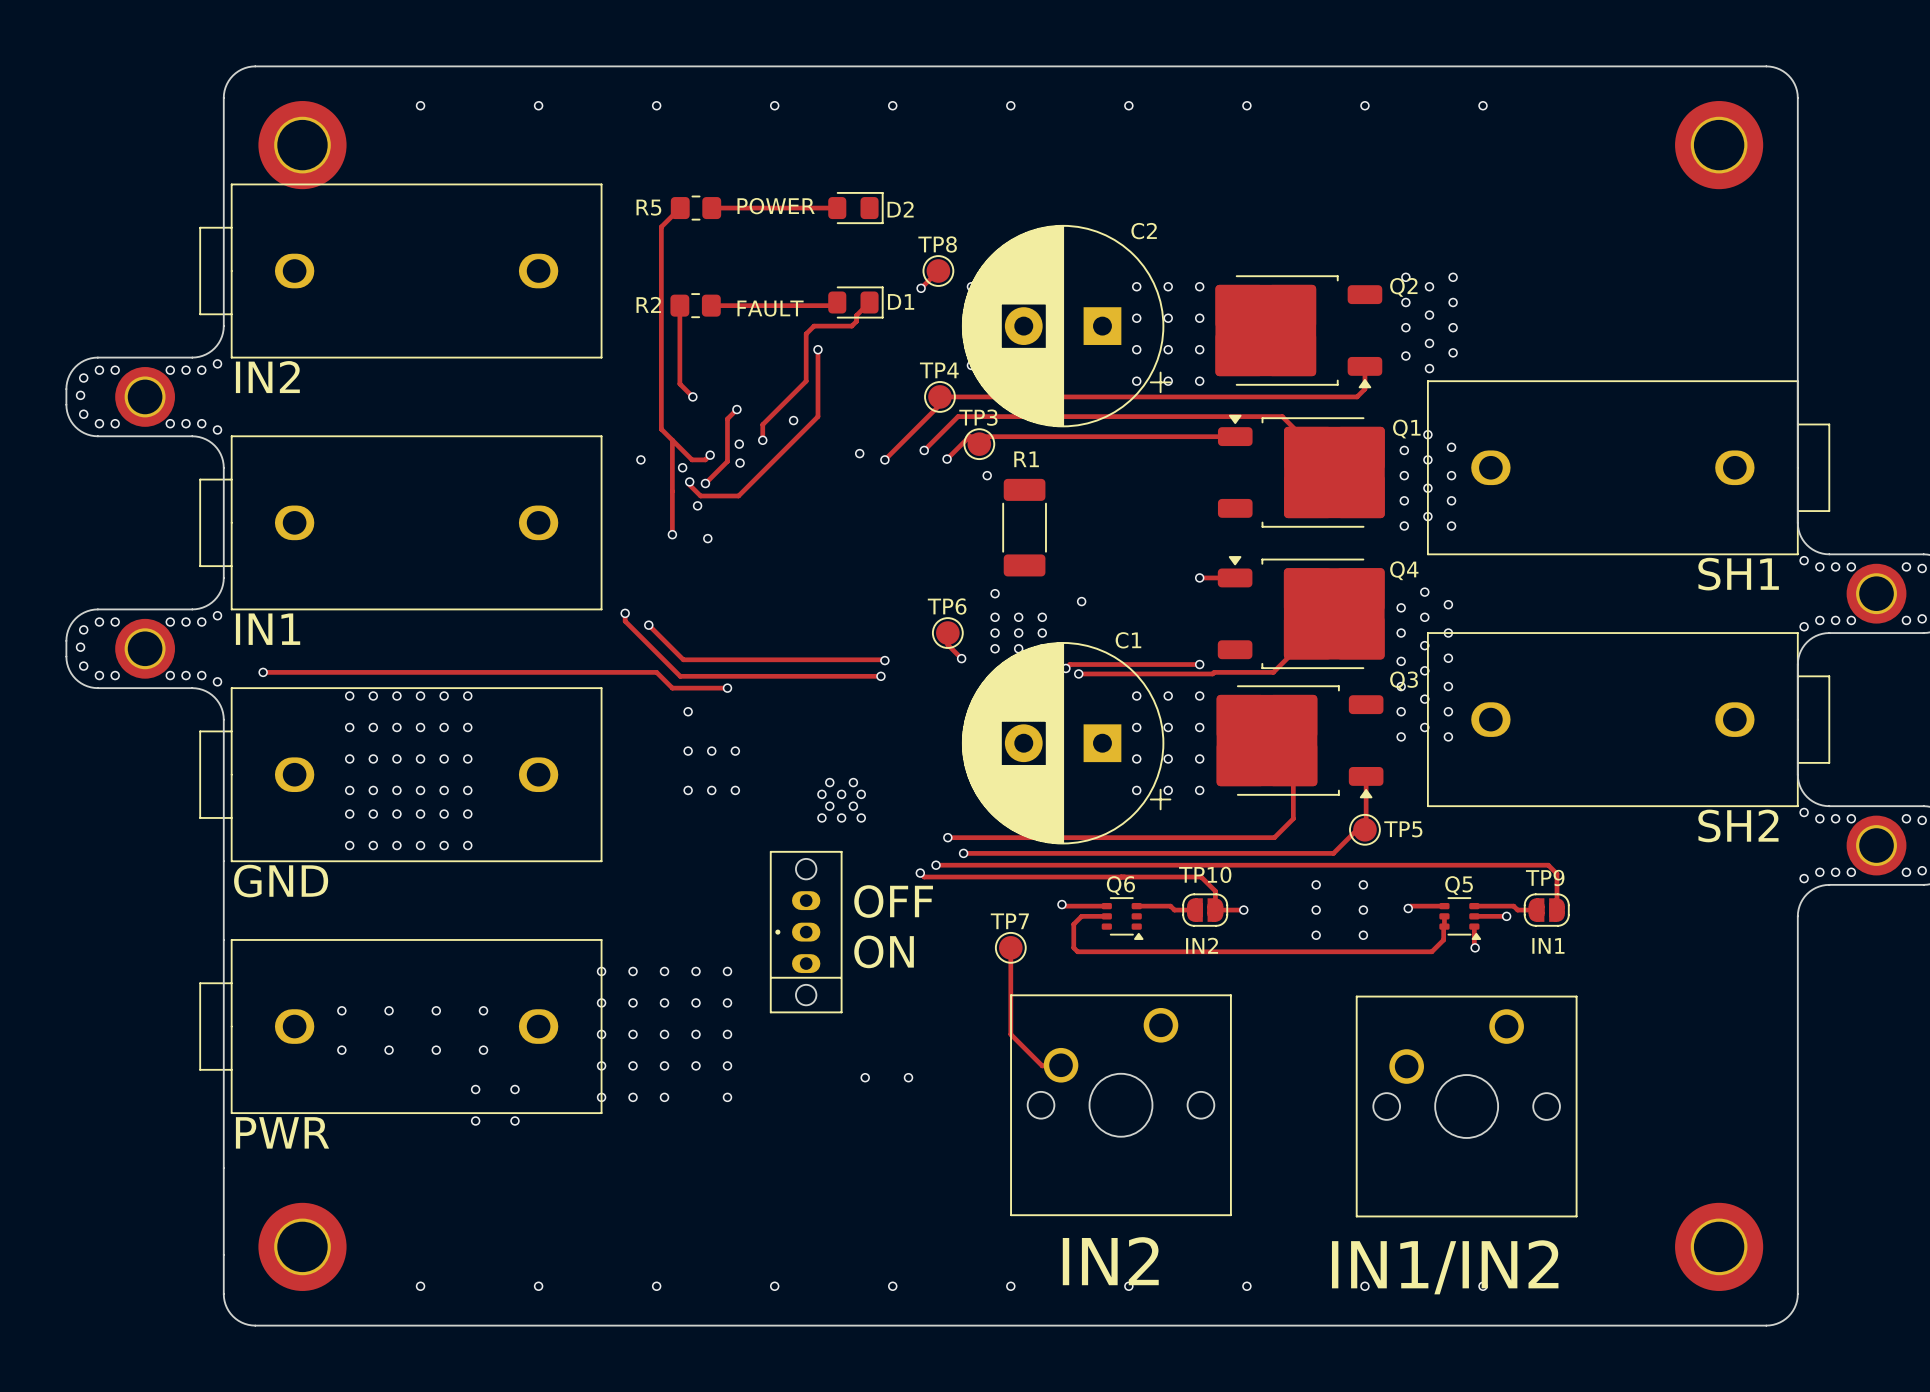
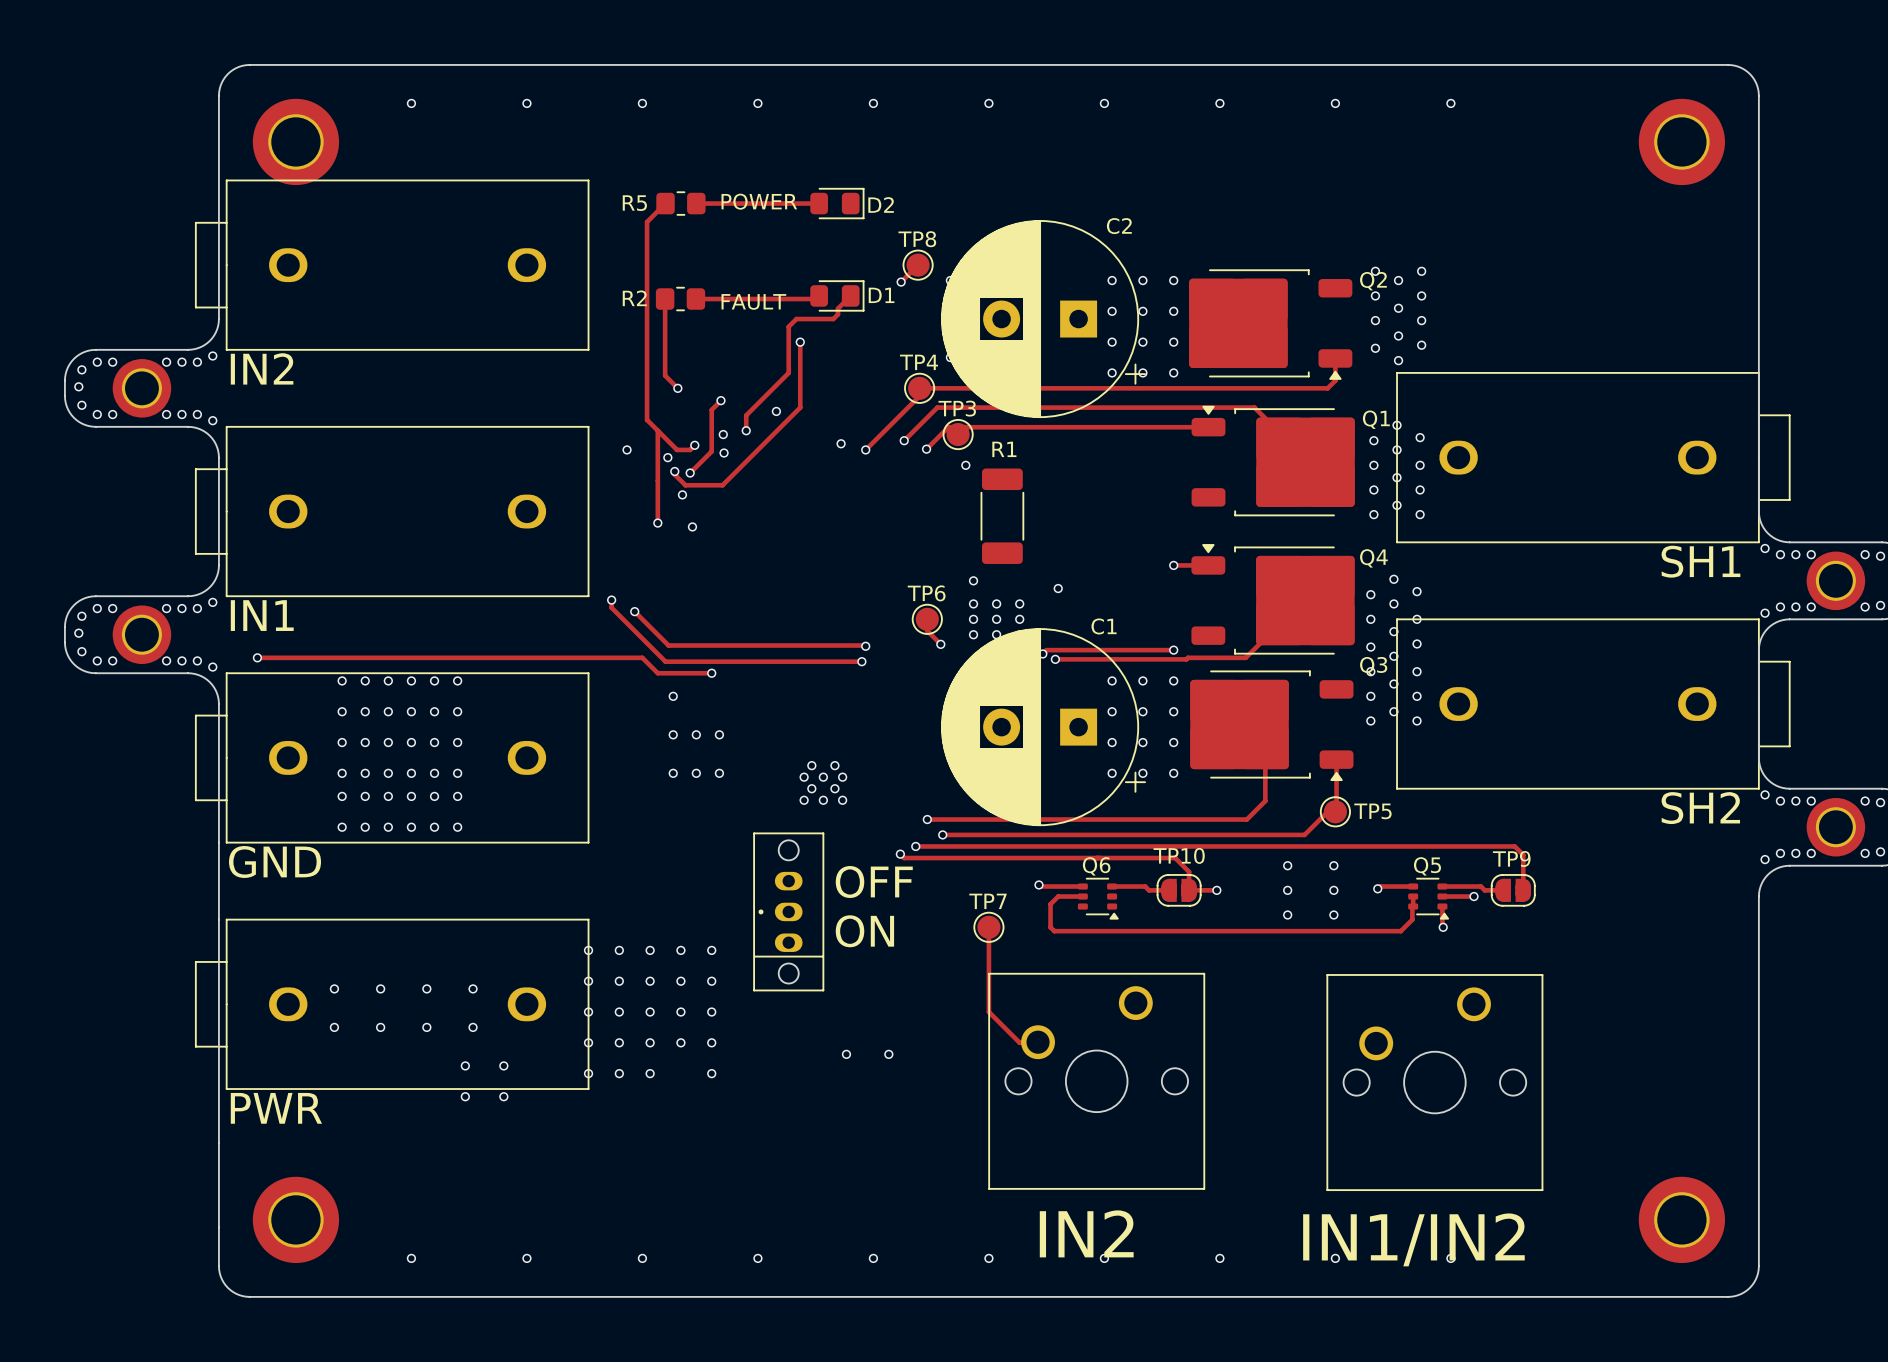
text: IN2 (1202, 945) -> none
text: IN1 (1548, 945) -> none

